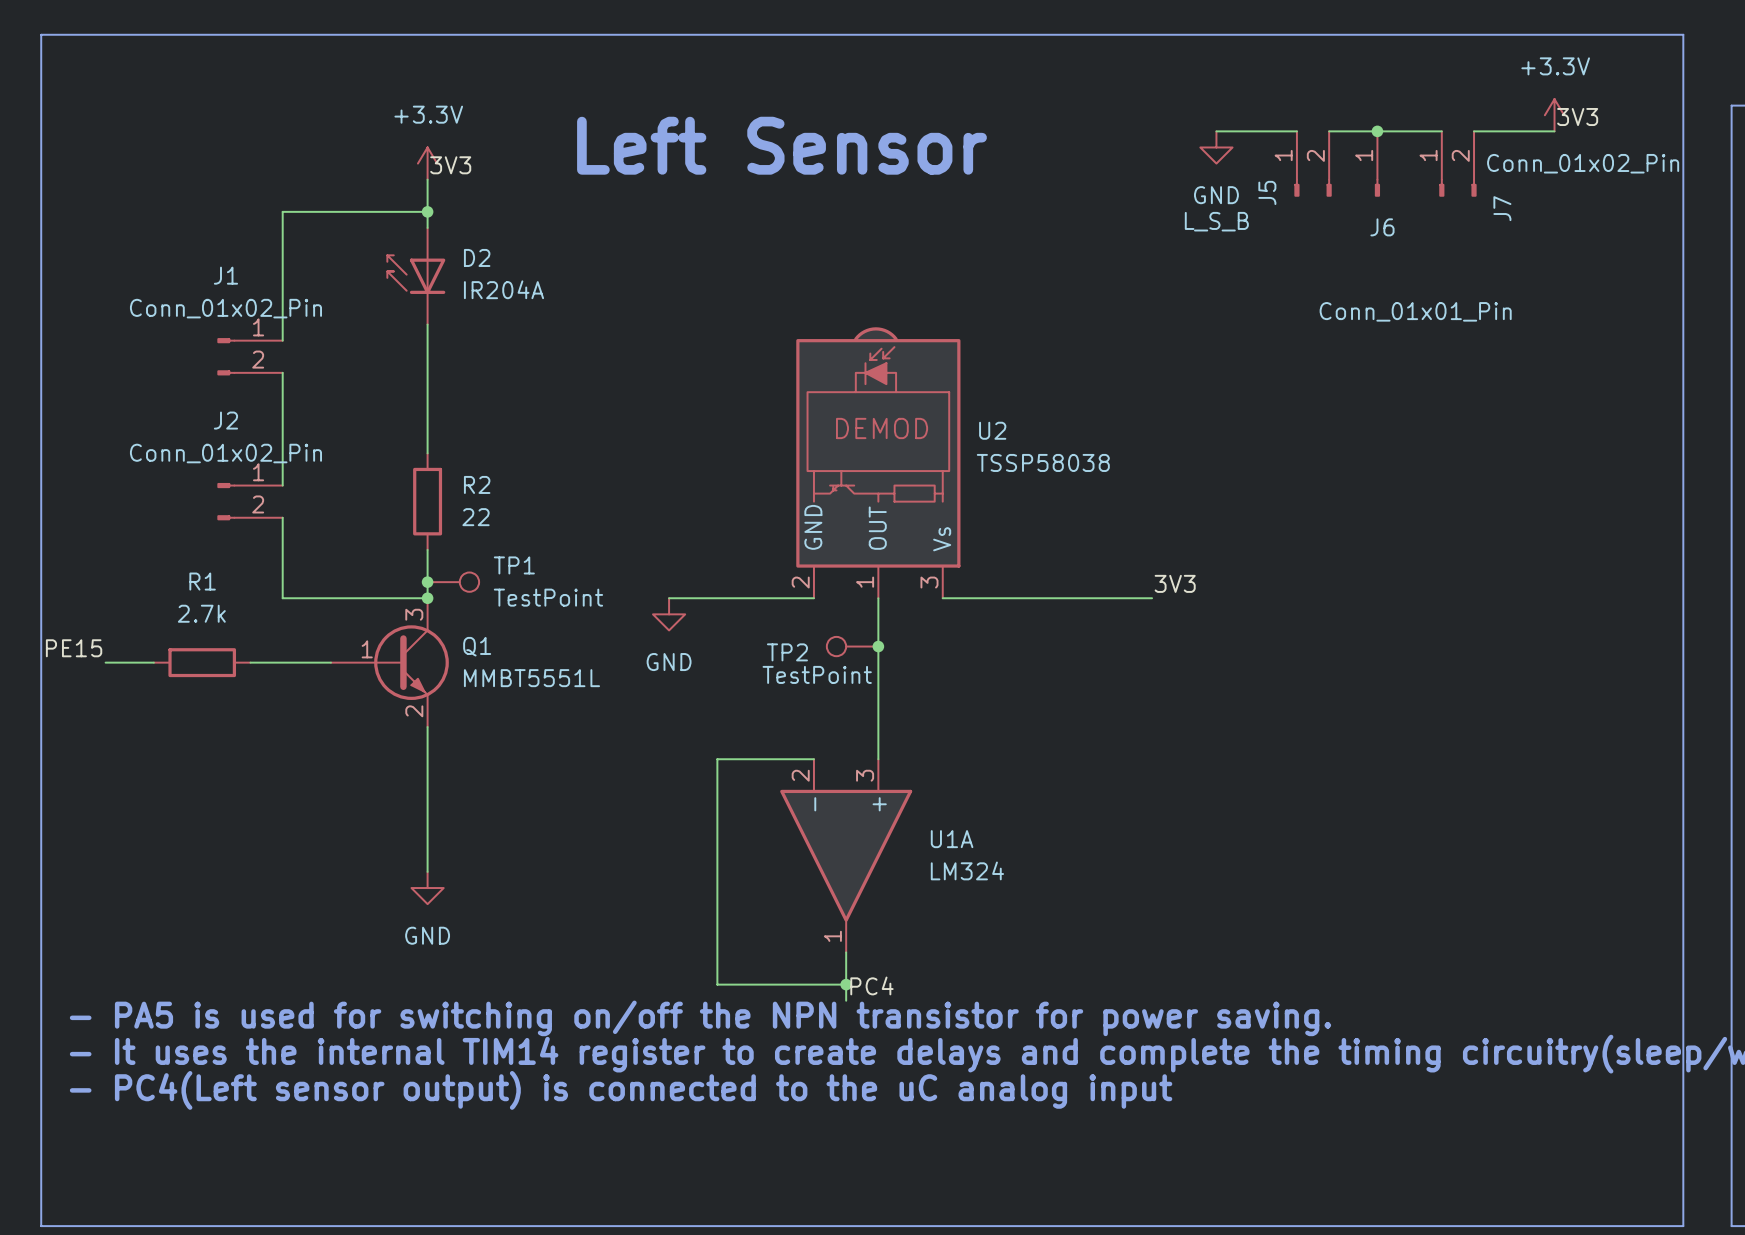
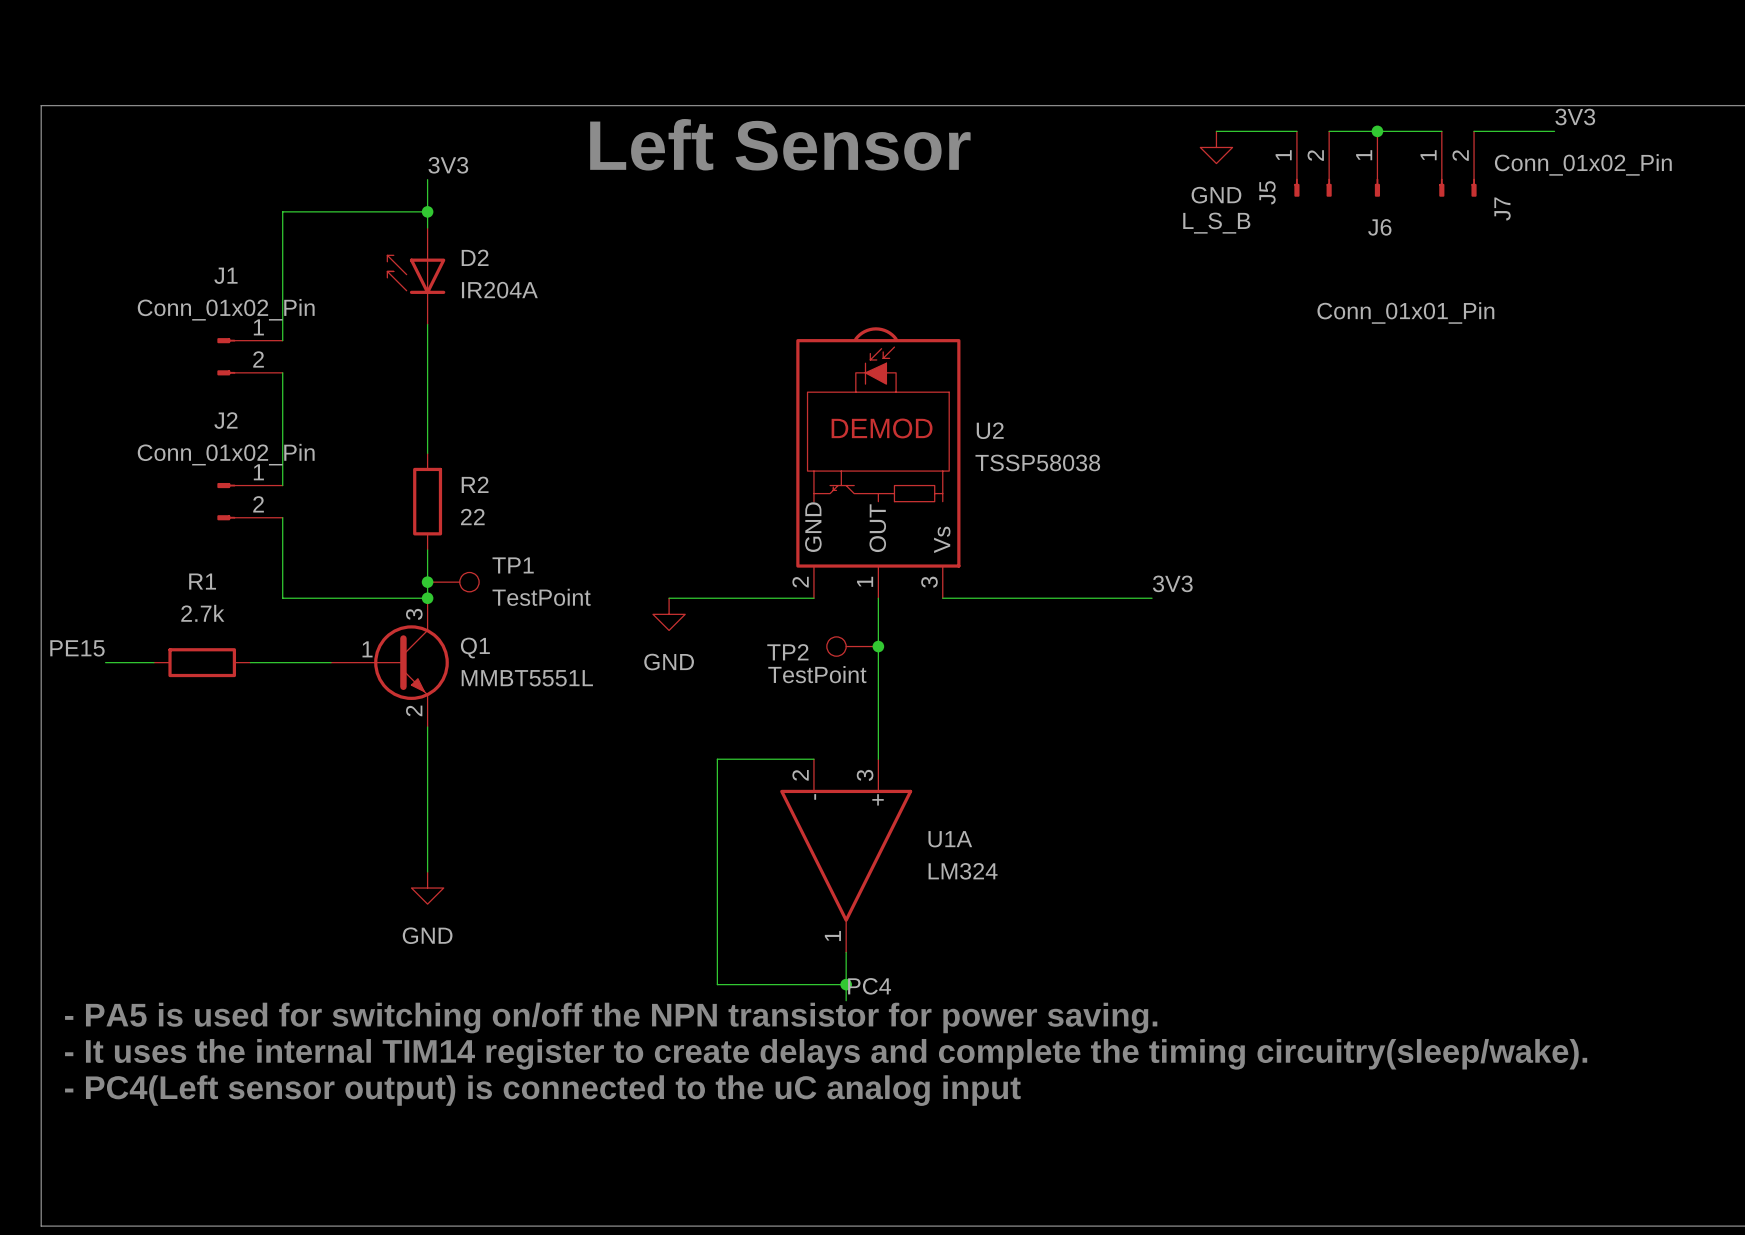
line: (41, 105) (41, 34) (1683, 34) (1683, 1226) -> (41, 105) (1731, 105)
line: (1731, 105) (1731, 1226) -> (1683, 1226) (1731, 1226)
power symbol: +3.3V (1554, 115) -> none
power symbol: +3.3V (427, 163) -> none

